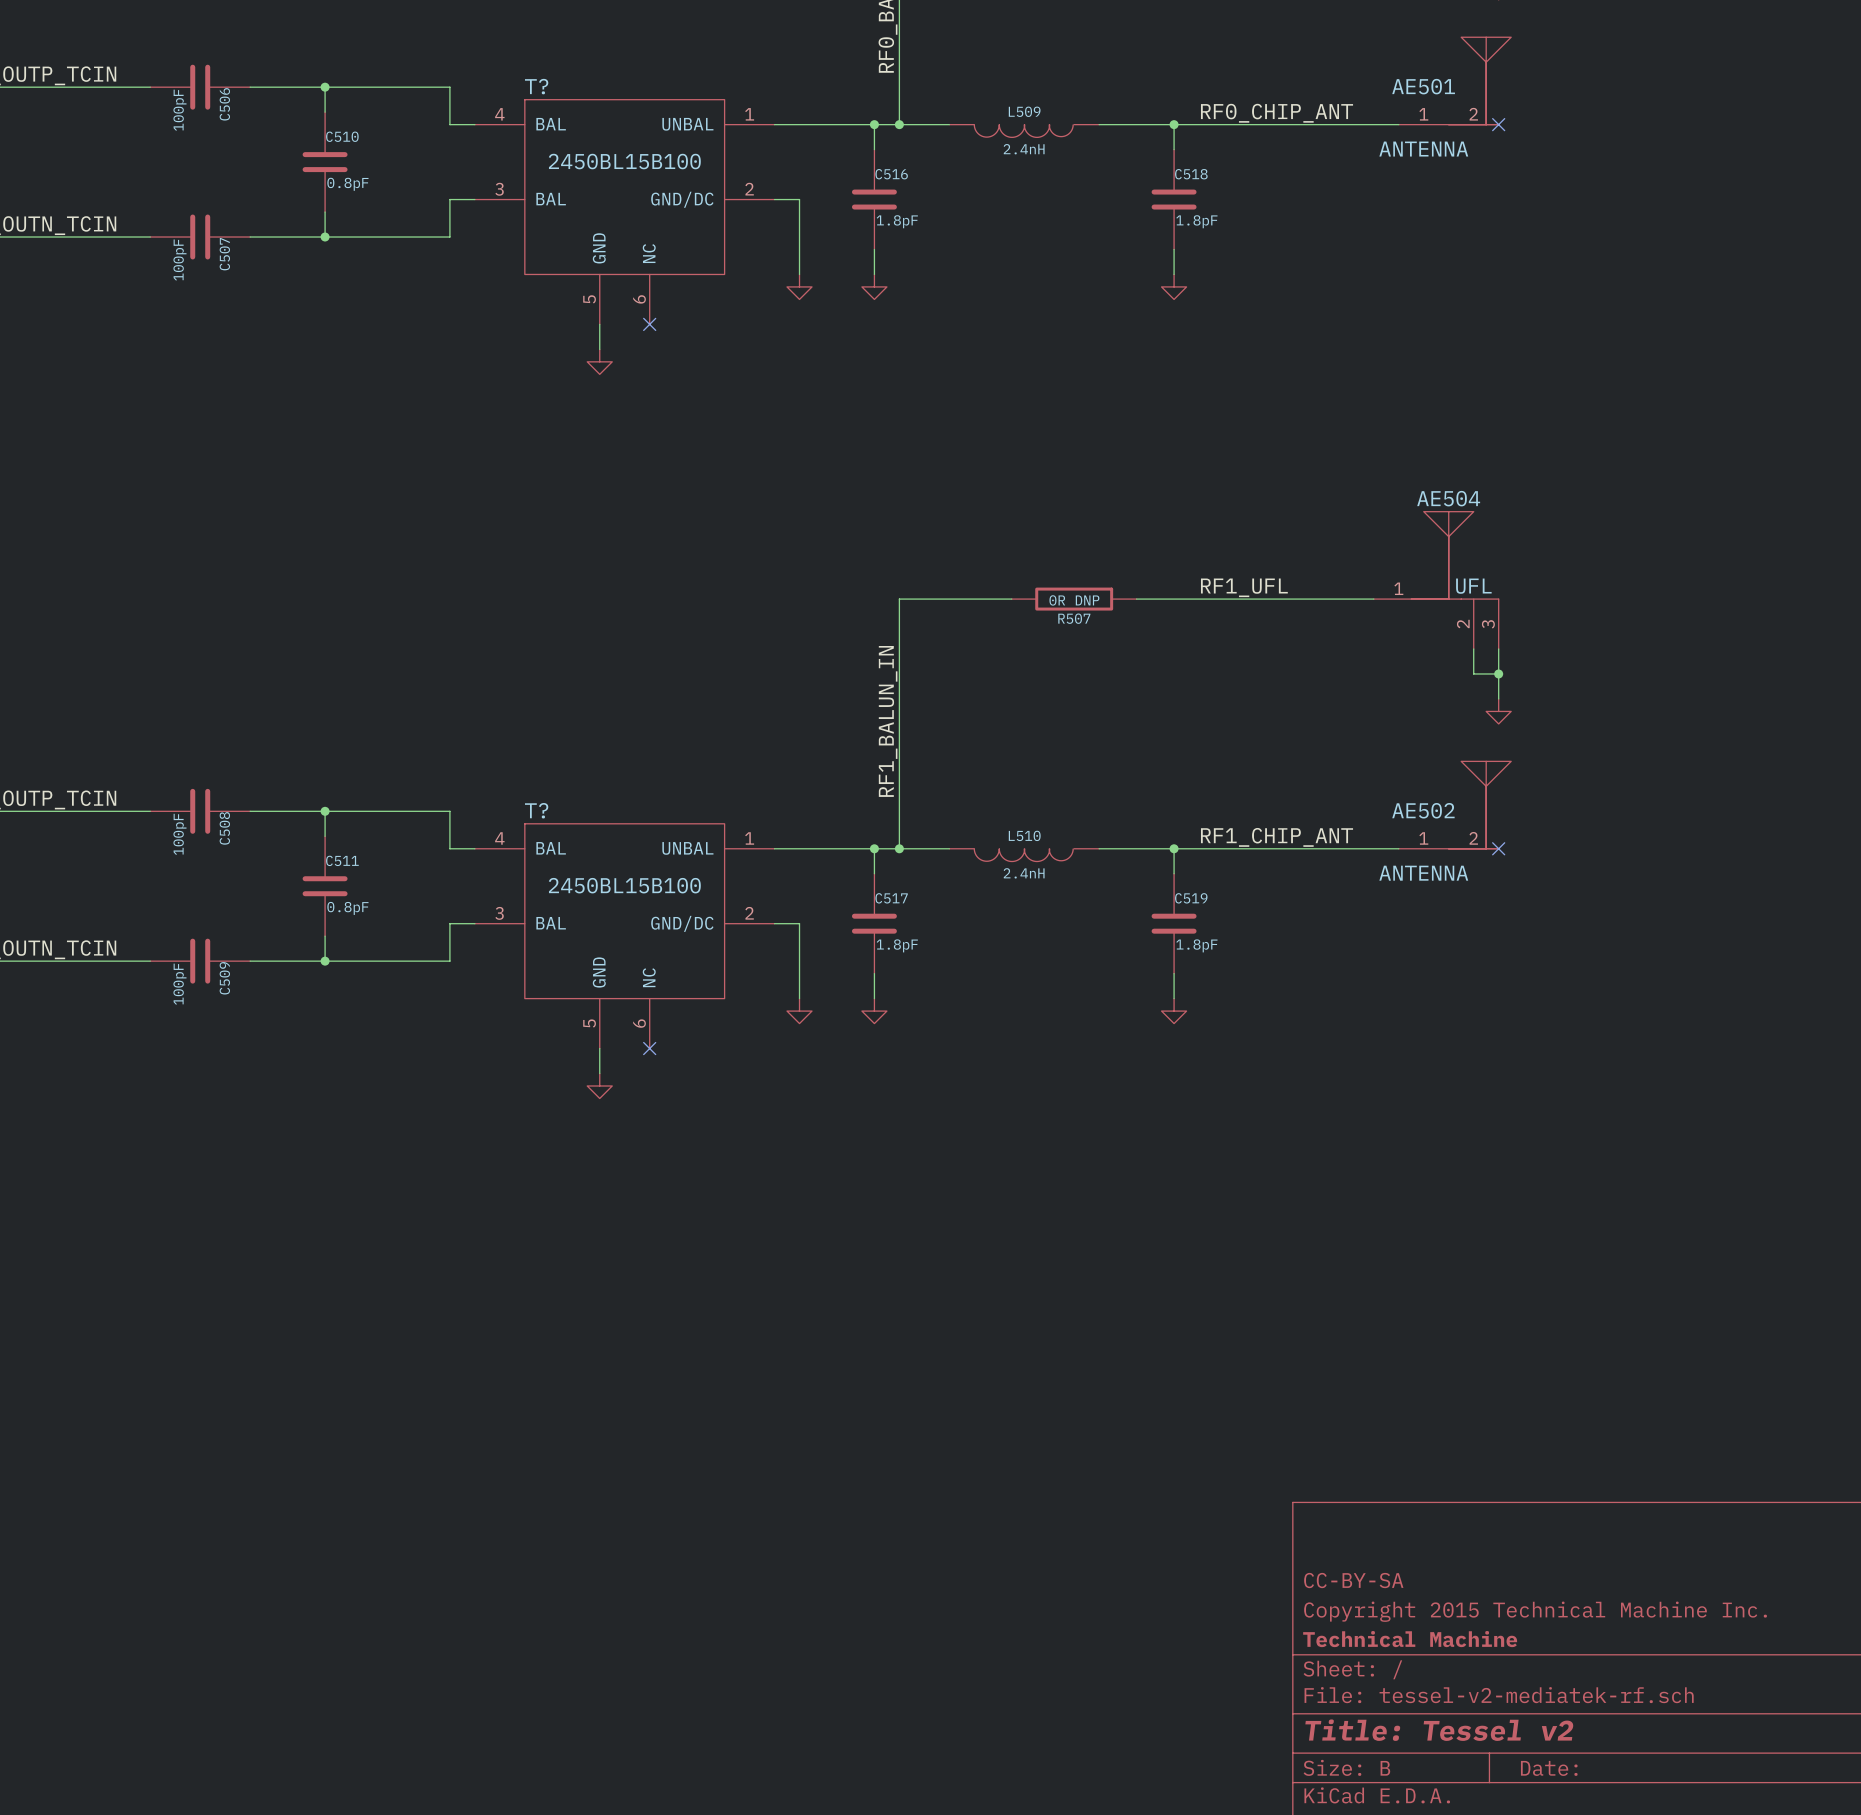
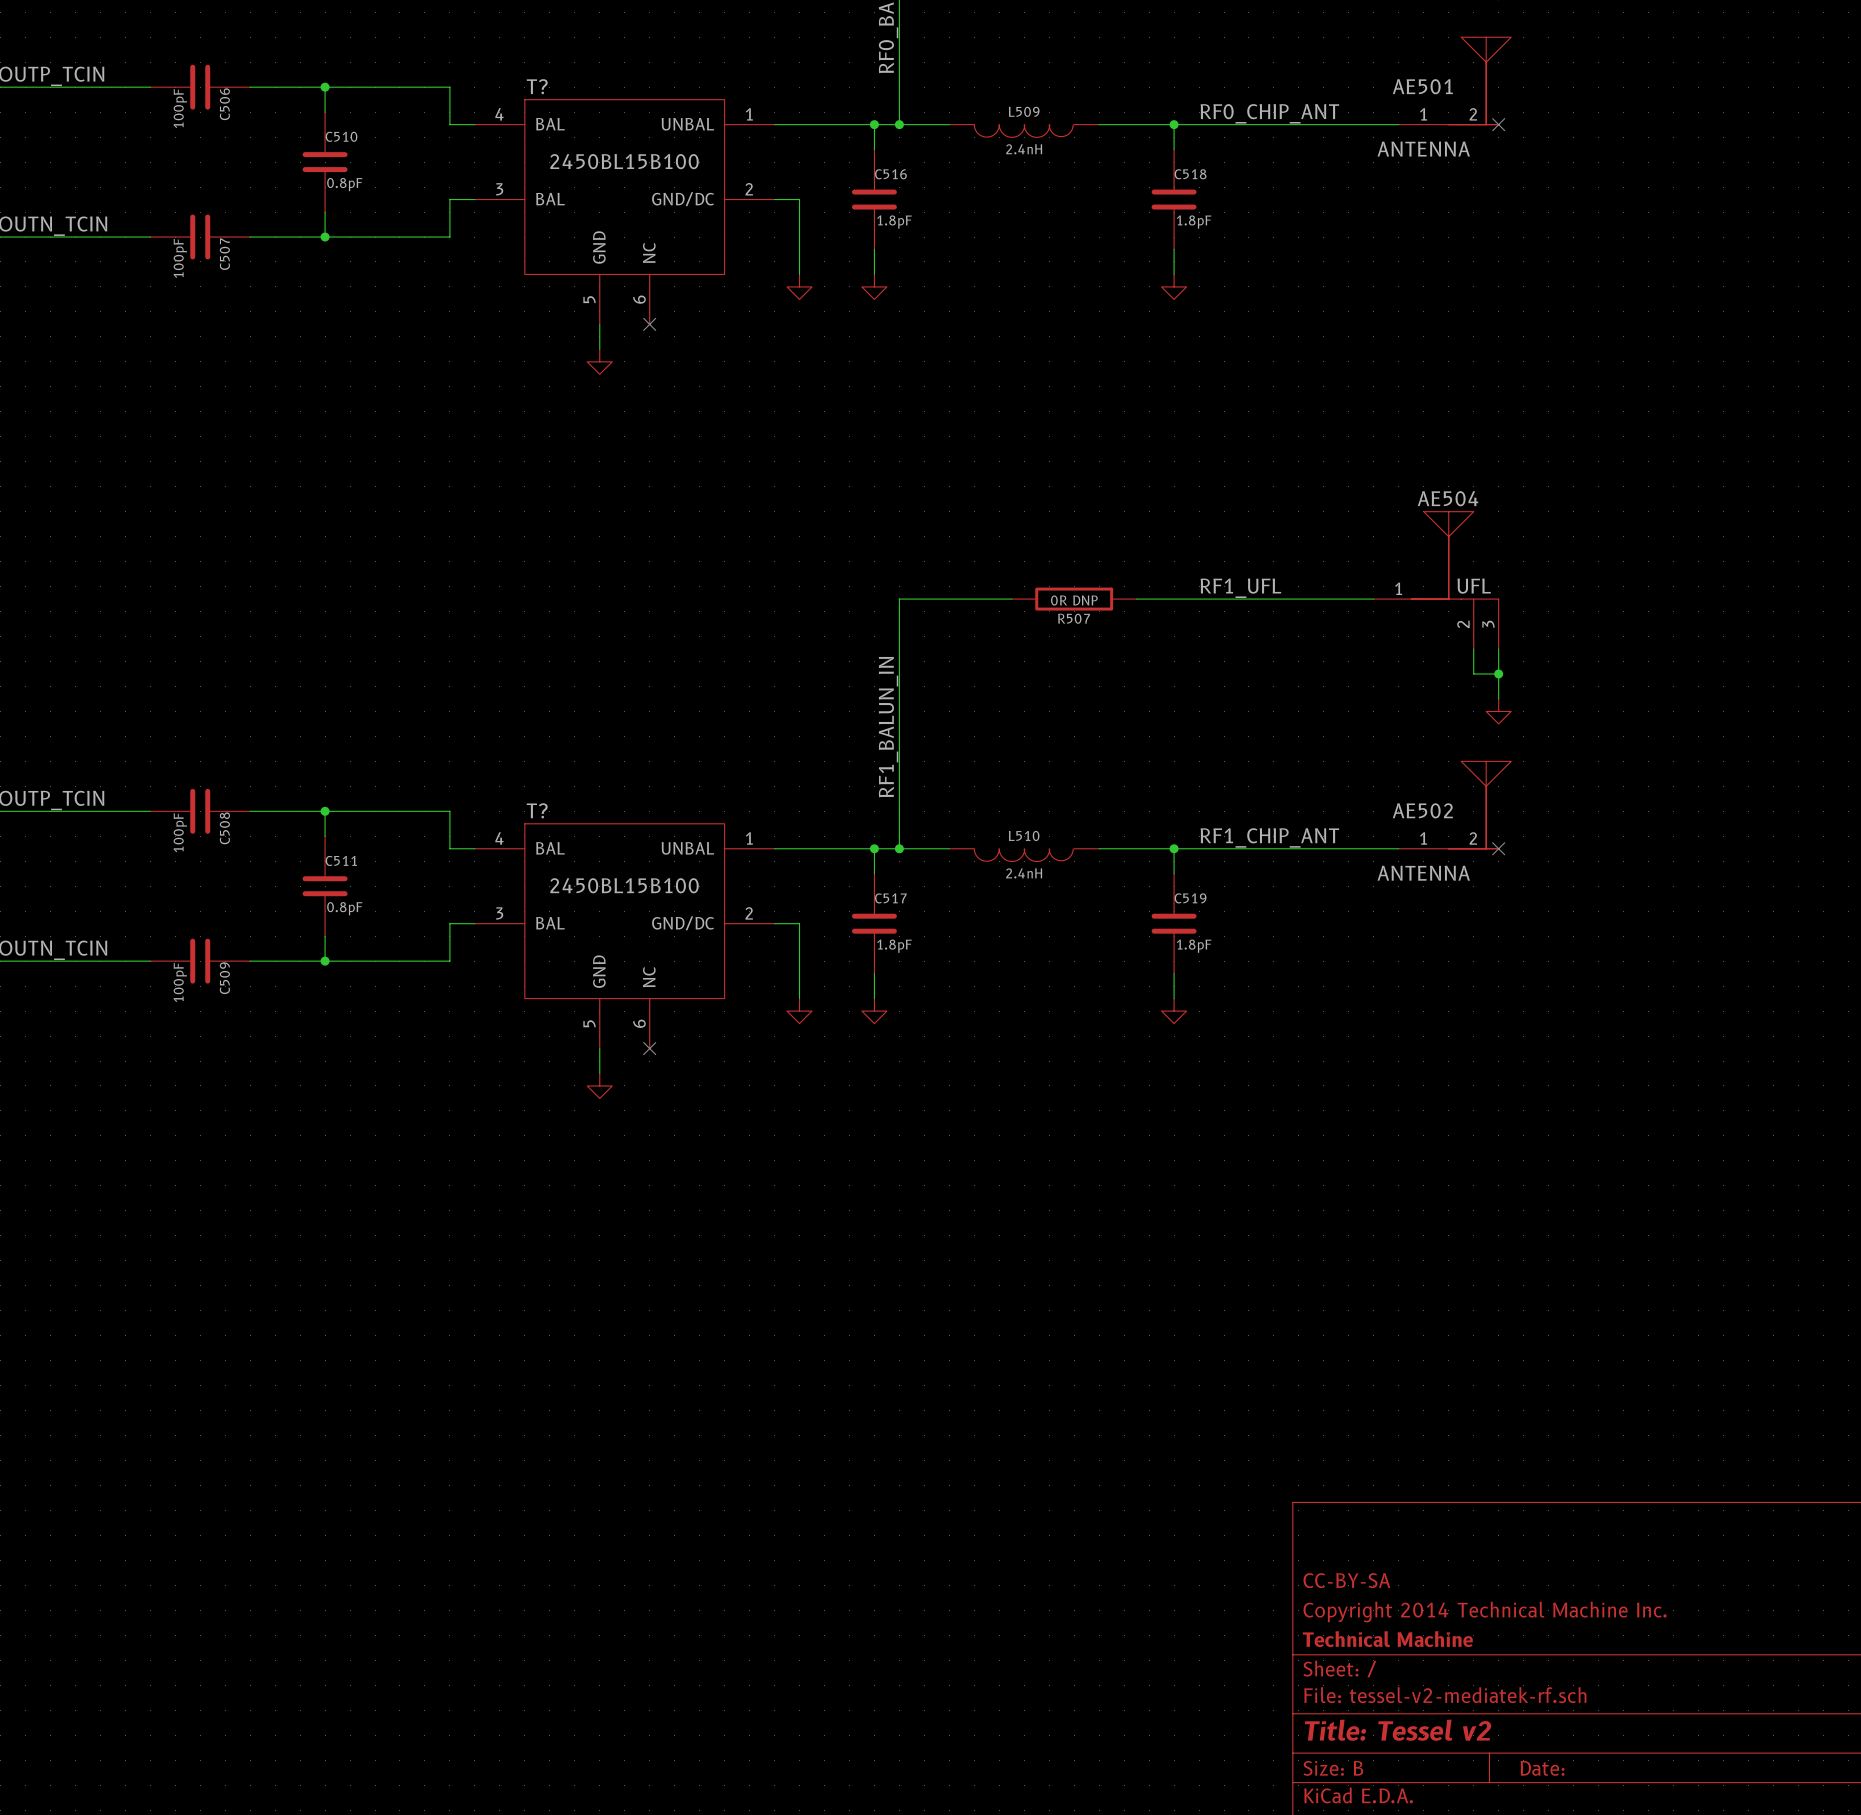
title block: Copyright 2015 Technical Machine Inc. (1535, 1611) -> Copyright 2014 Technical Machine Inc. (1485, 1612)

